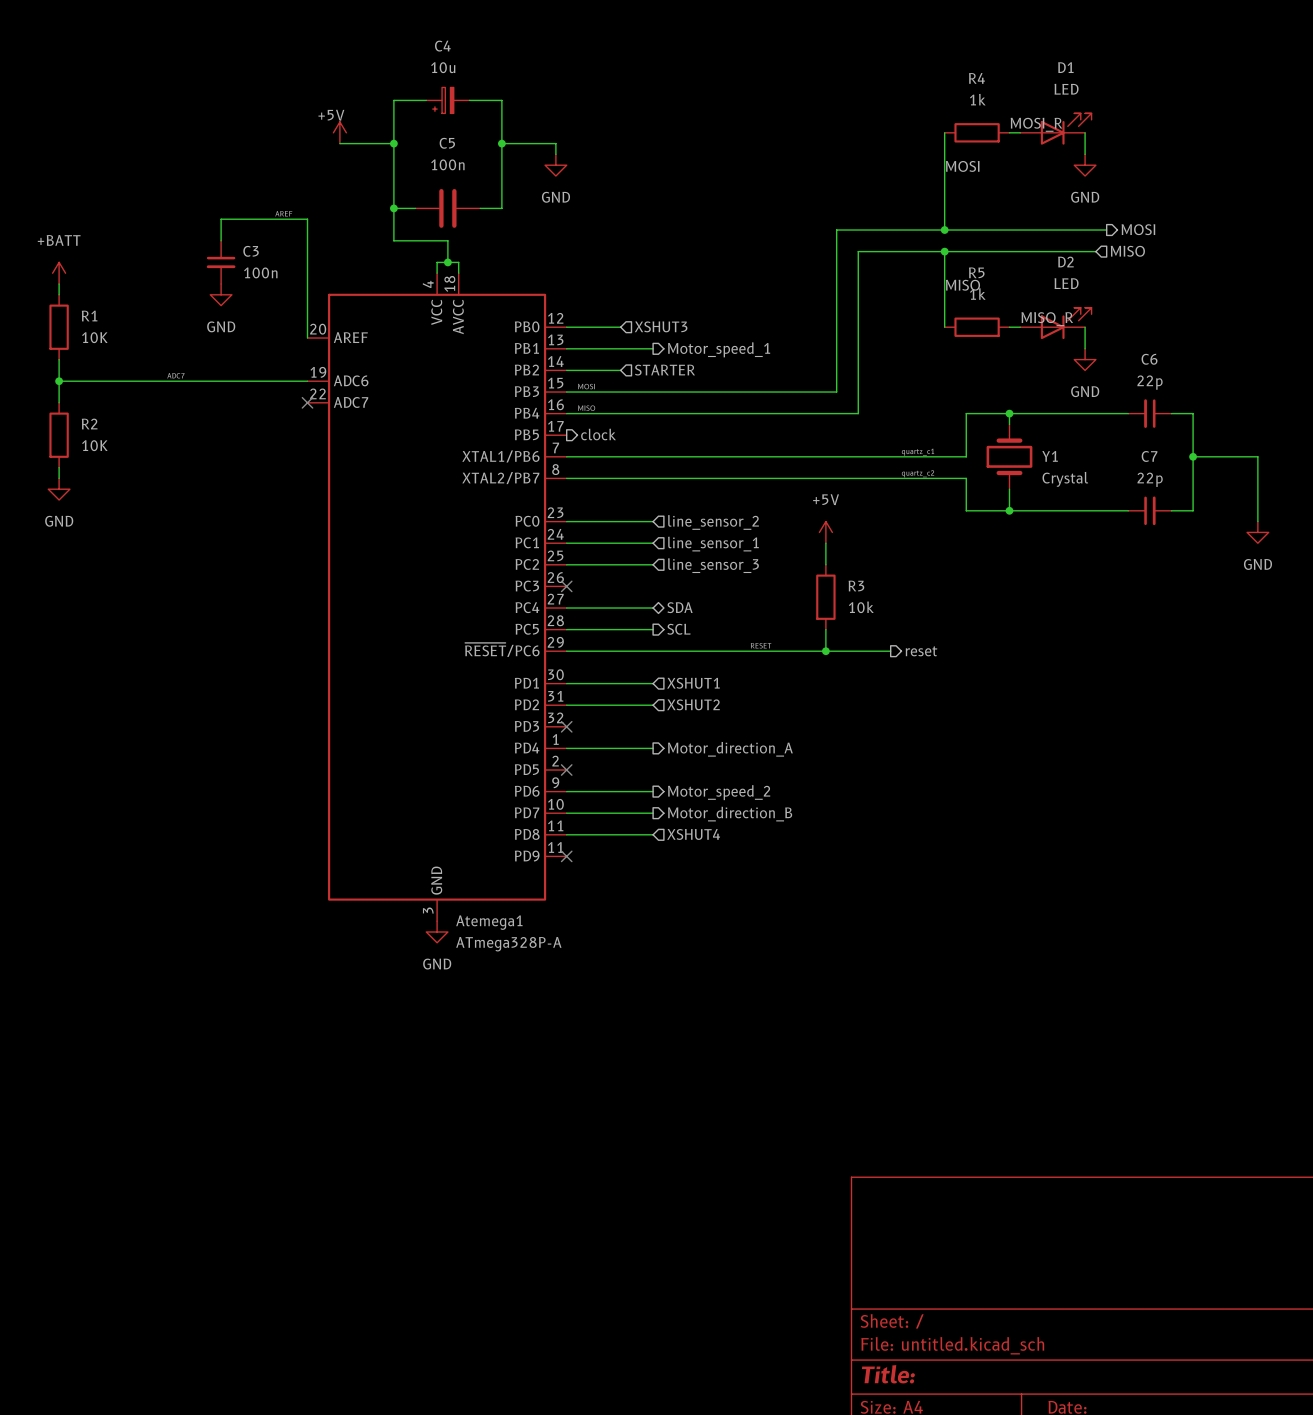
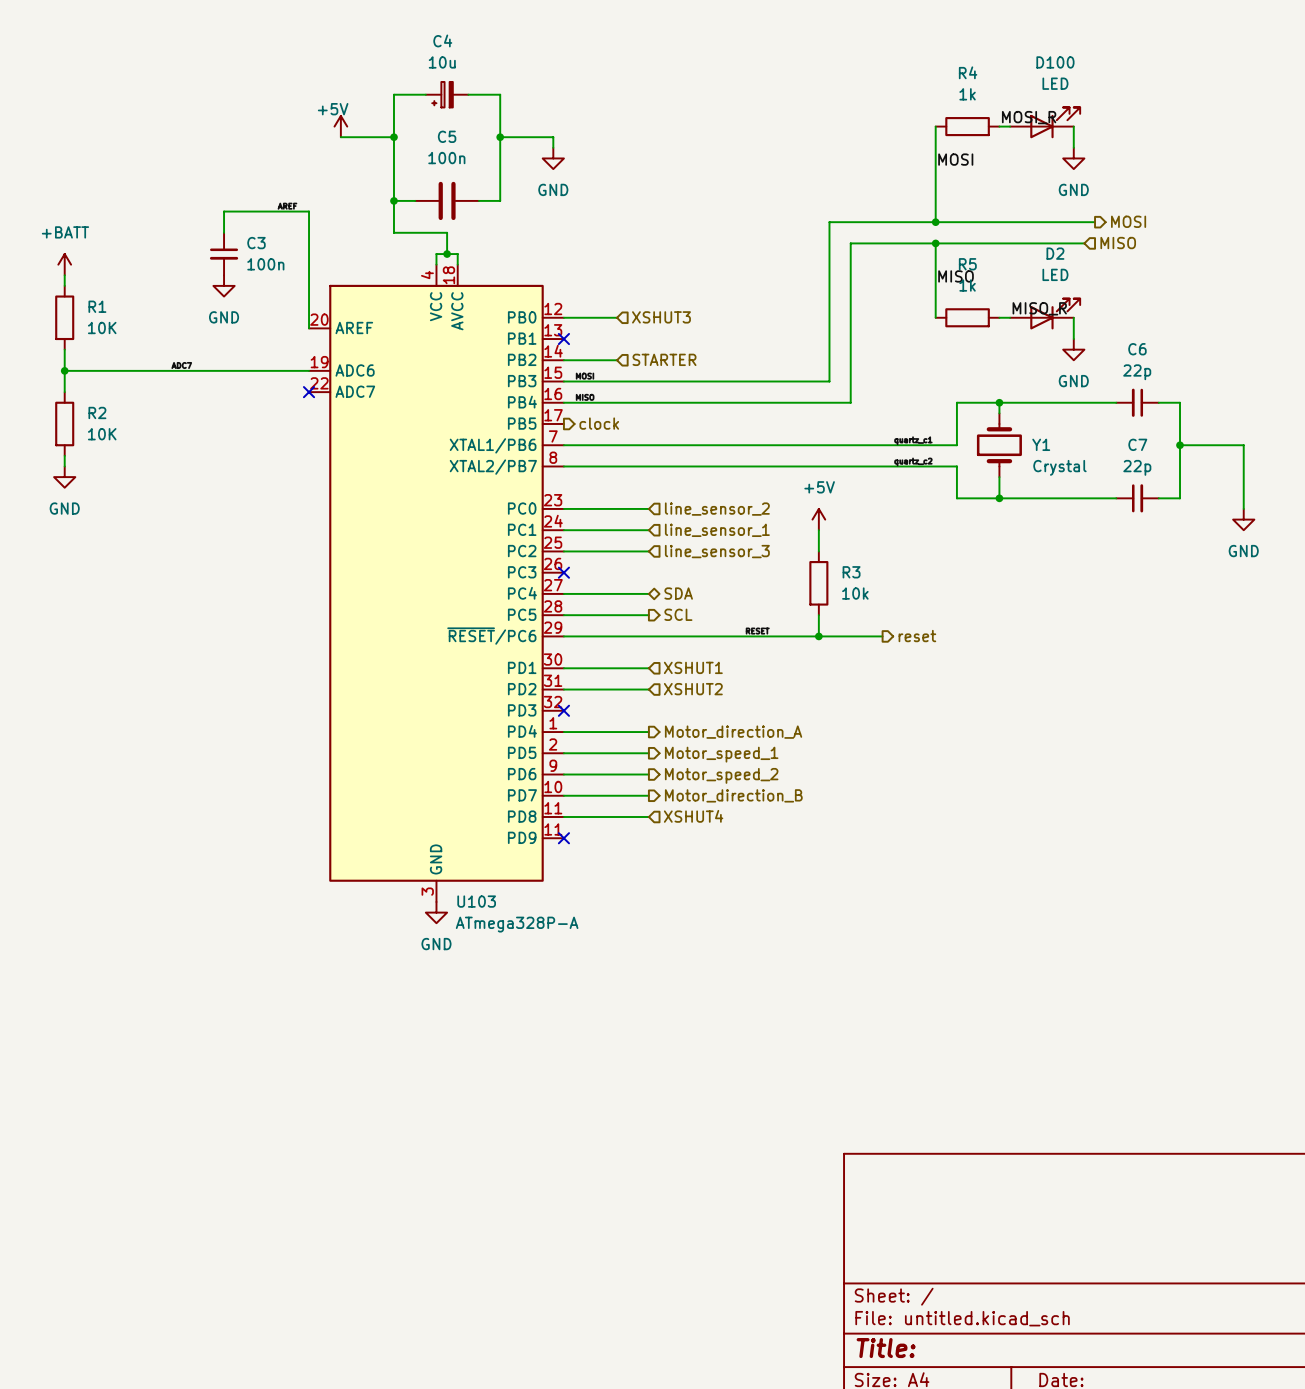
D1 name: D1 (1065, 67) -> D100 (1055, 62)
wire: (566, 348) (653, 348) -> none
no-connect mark: none -> (563, 339)
hierarchical label: Motor_speed_1 (719, 349) -> none
wire: none -> (563, 753) (648, 753)
no-connect mark: (566, 770) -> none
hierarchical label: none -> Motor_speed_1 (721, 754)
Atemega1 name: Atemega1 (489, 922) -> U103 (476, 901)

